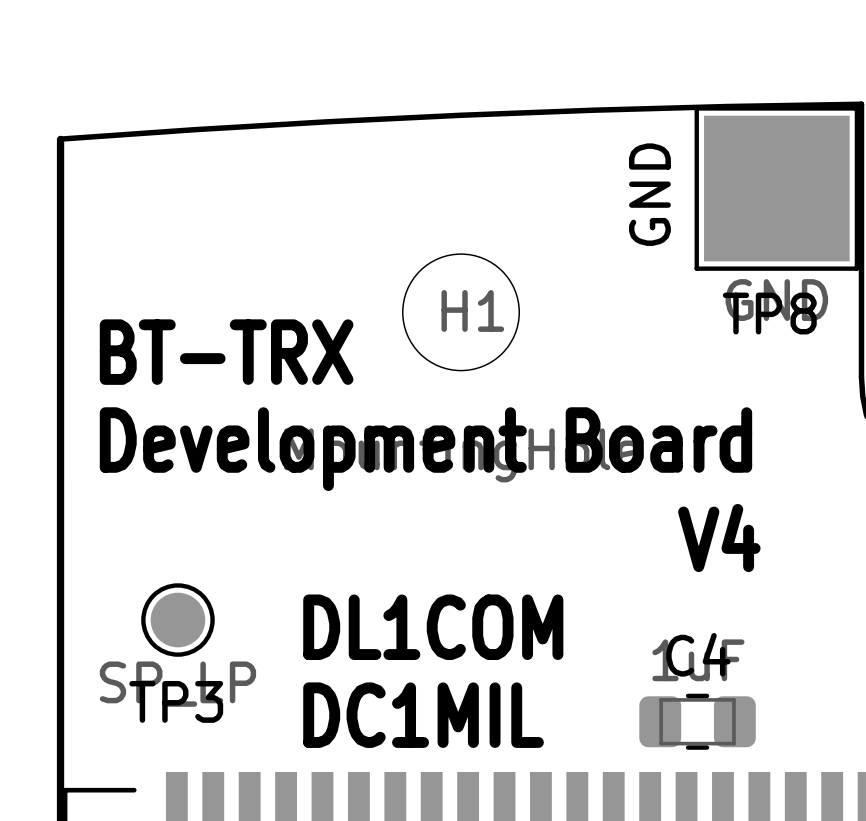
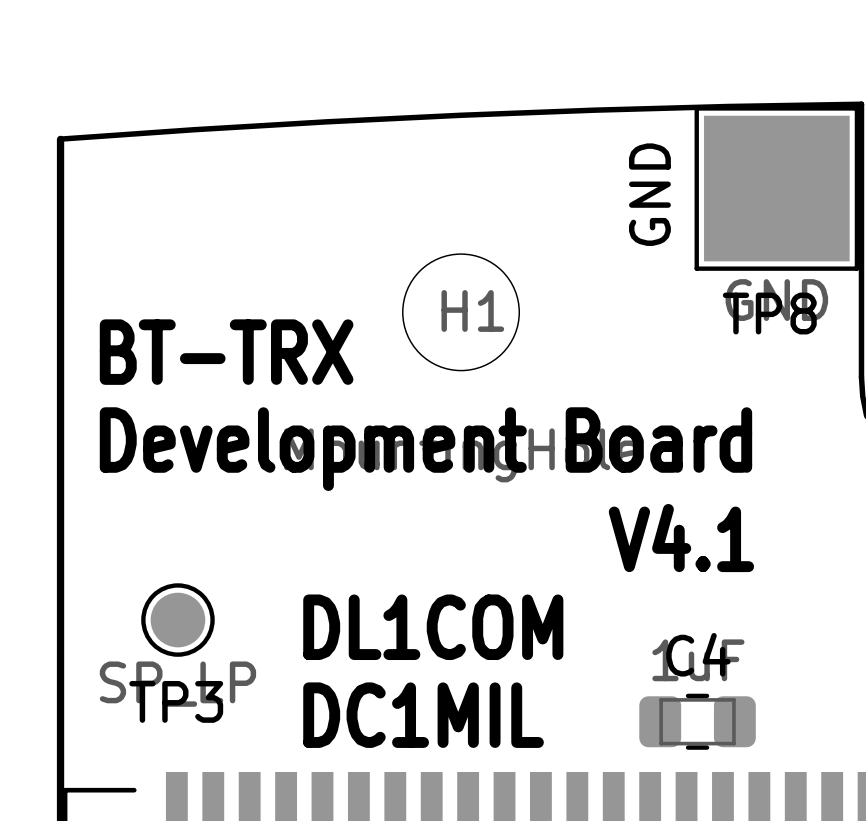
text: V4 (719, 538) -> V4.1 (681, 538)

